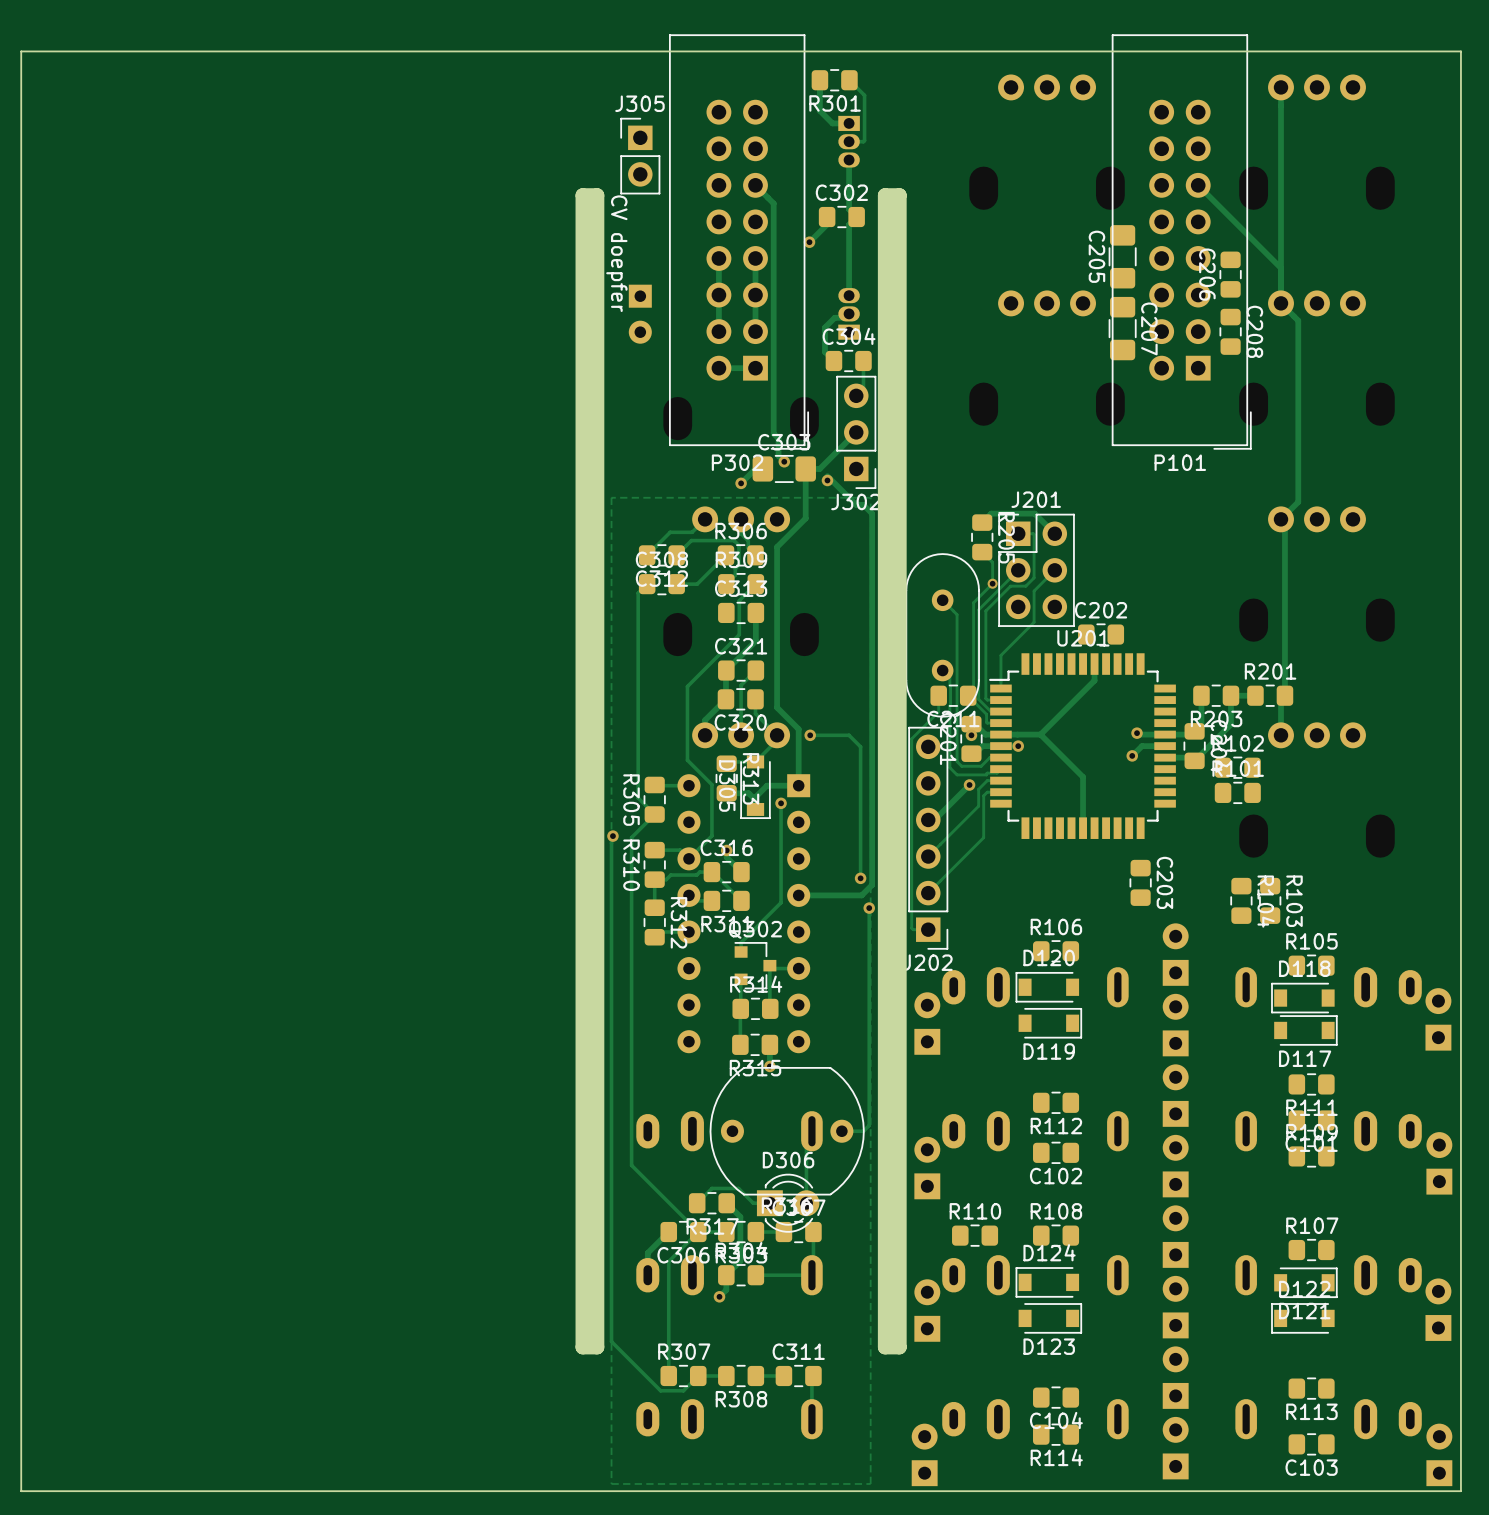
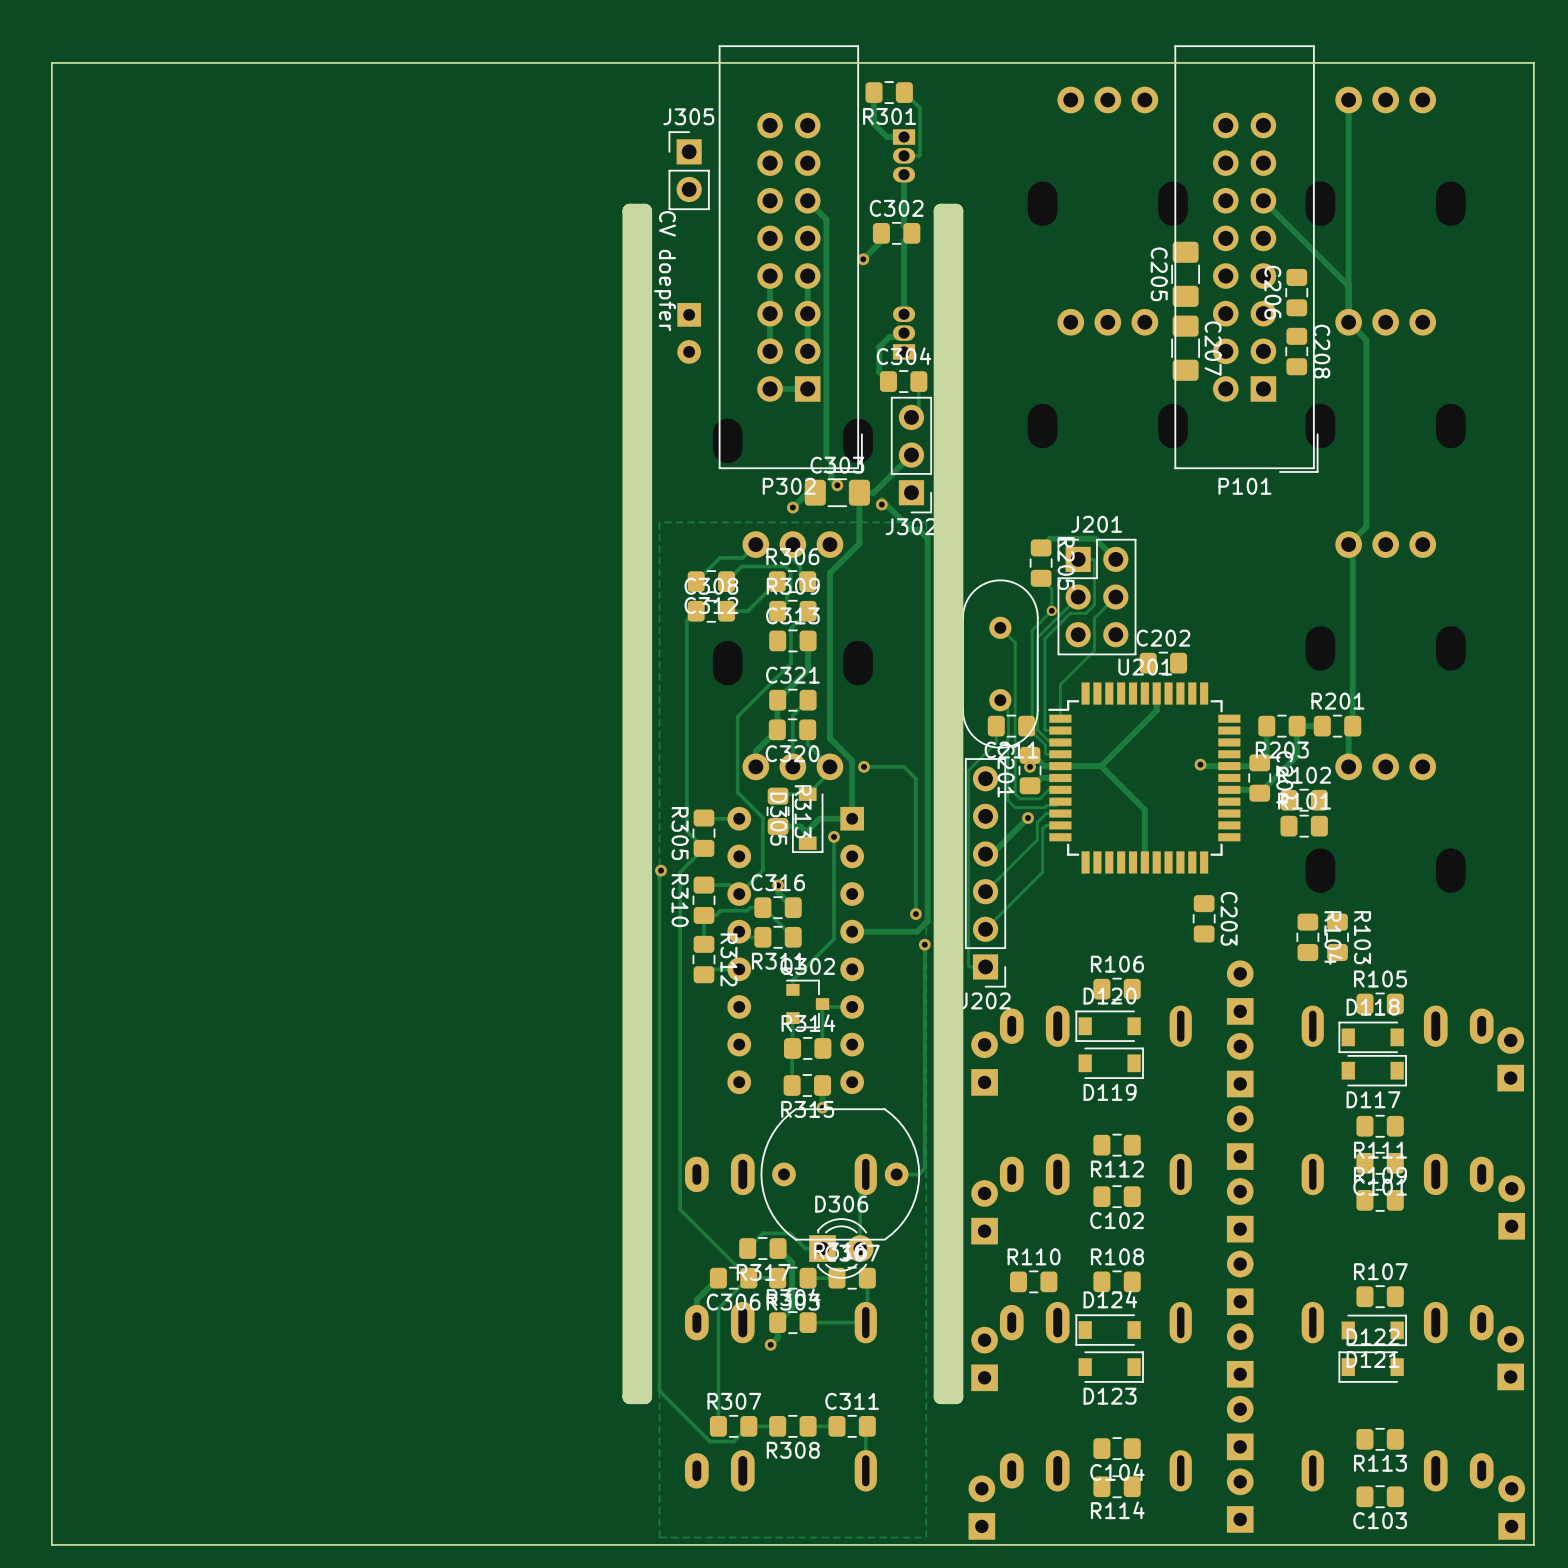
via: (1018, 746) -> none
track: (1165, 746) (1142, 746) (1132, 755) -> none
via: (1132, 755) -> none

